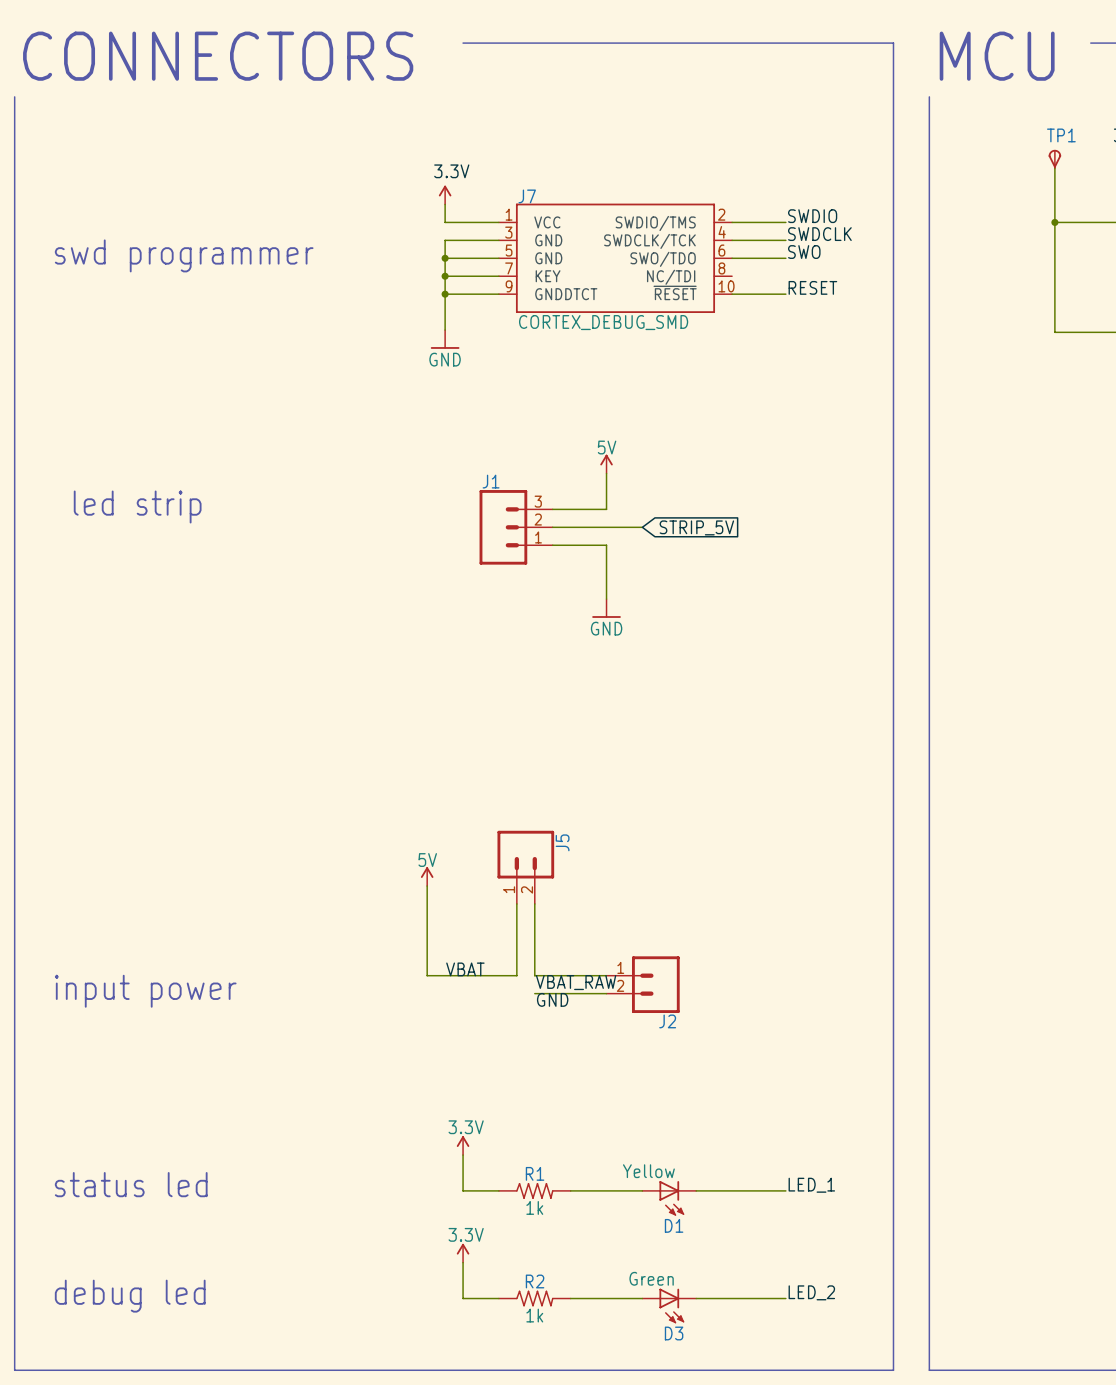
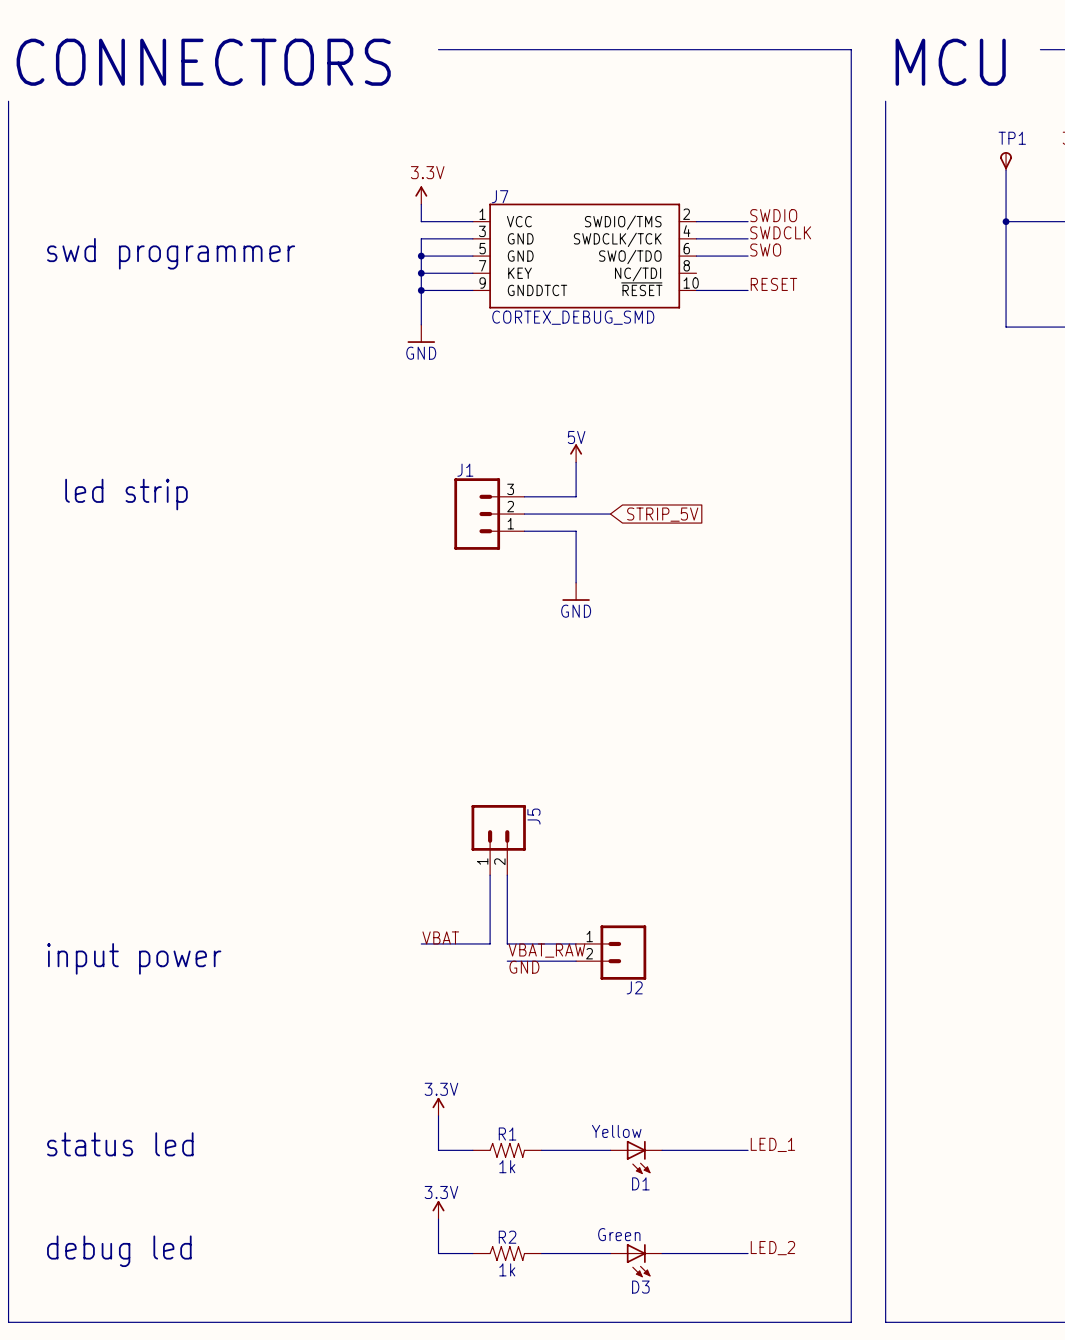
power symbol: 5V (427, 876) -> none
wire: (427, 886) (427, 975) (445, 975) -> none

